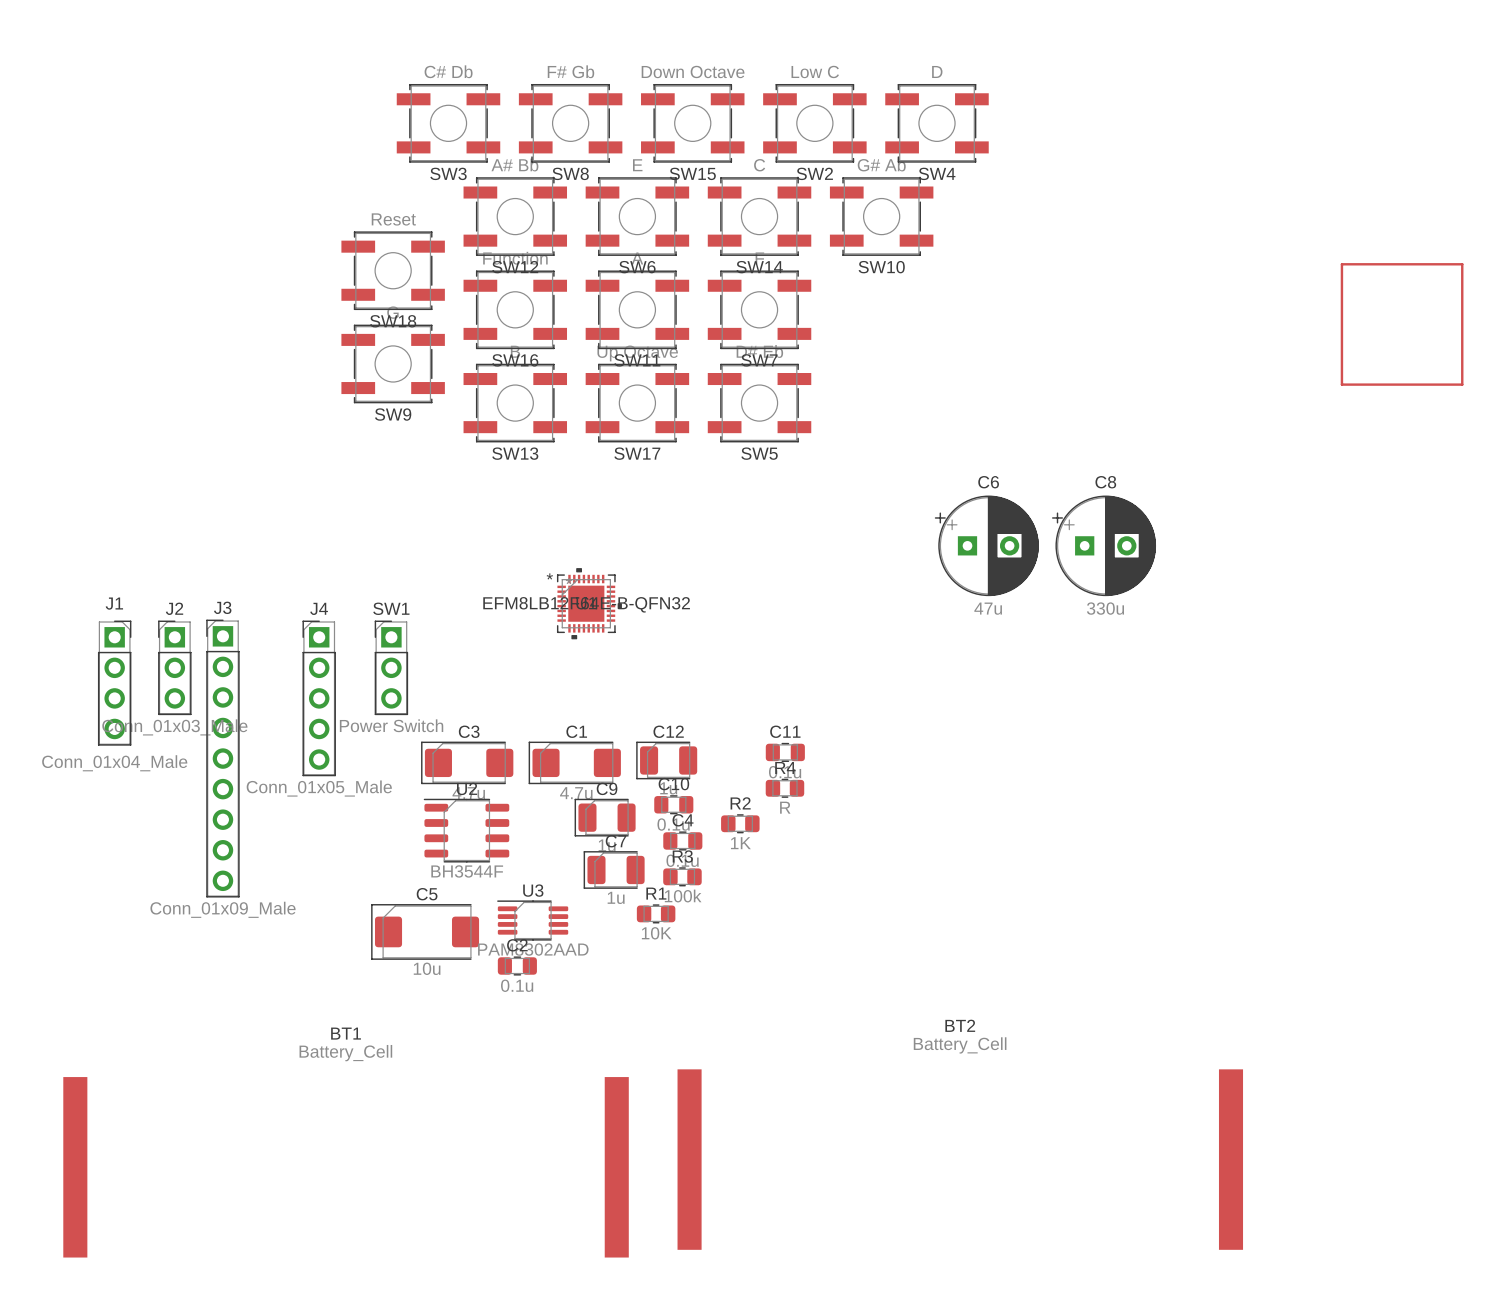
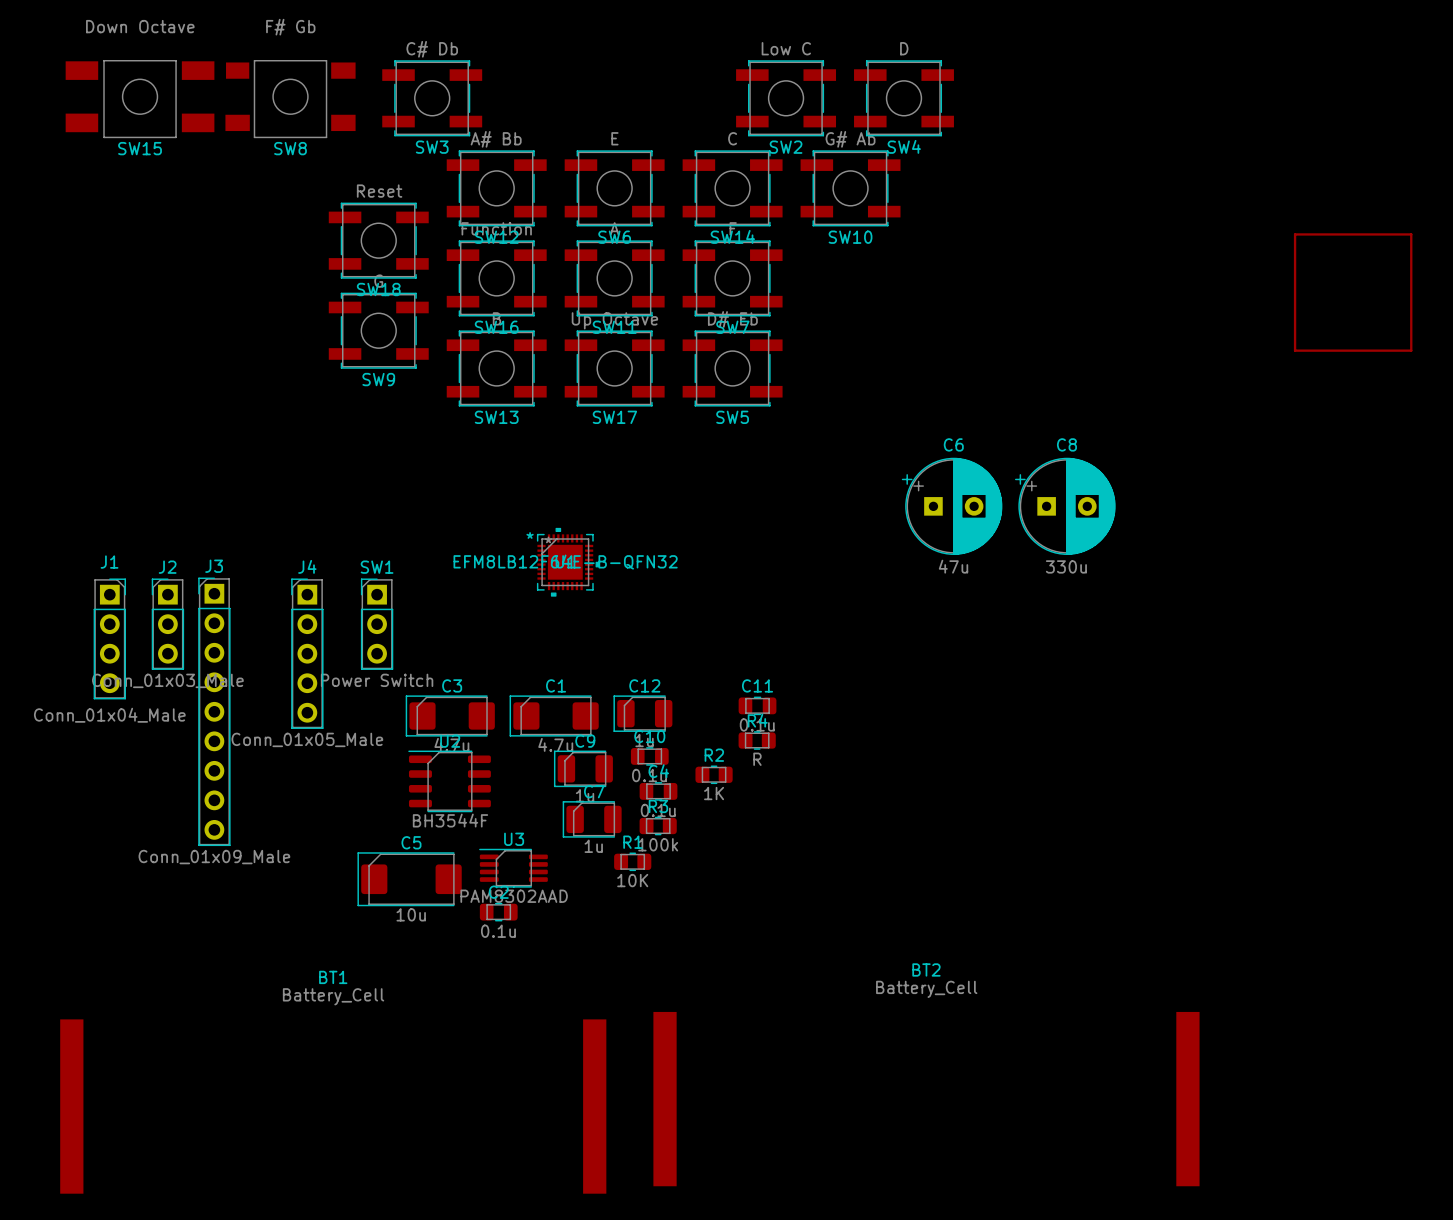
SW8 footprint: [518, 83, 623, 163] -> [225, 60, 356, 139]
SW15 footprint: [641, 83, 745, 163] -> [65, 60, 215, 139]

